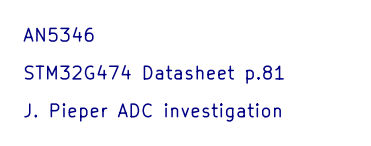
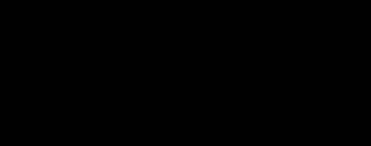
text: AN5346 (58, 34) -> none
text: STM32G474 Datasheet p.81 (154, 74) -> none
text: J. Pieper ADC investigation (152, 112) -> none

